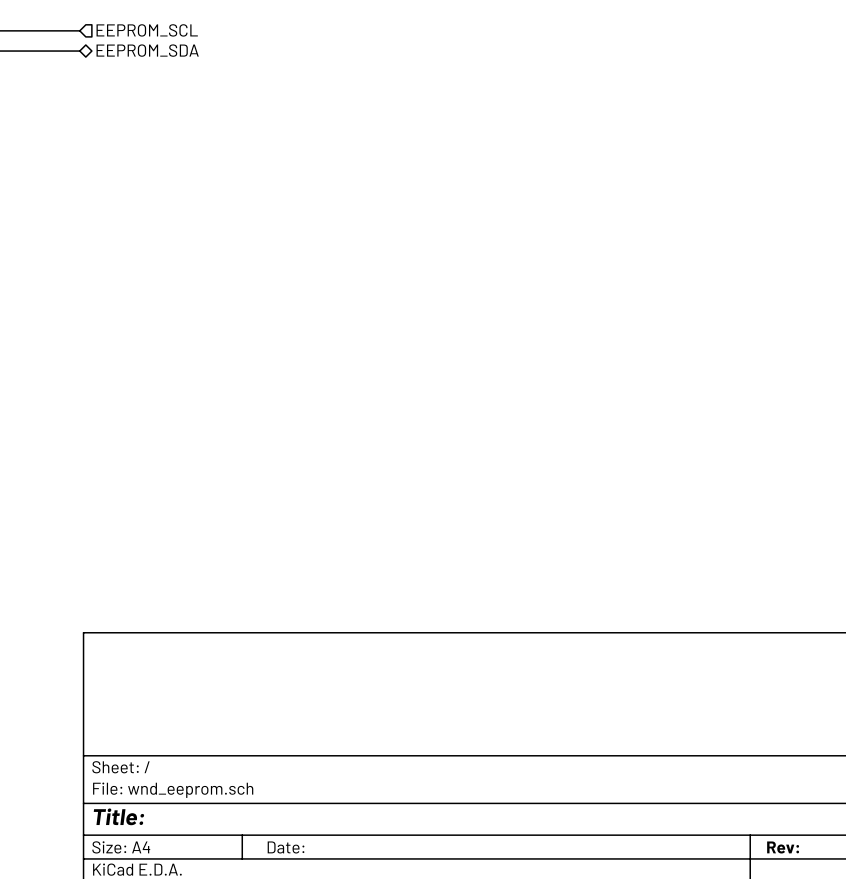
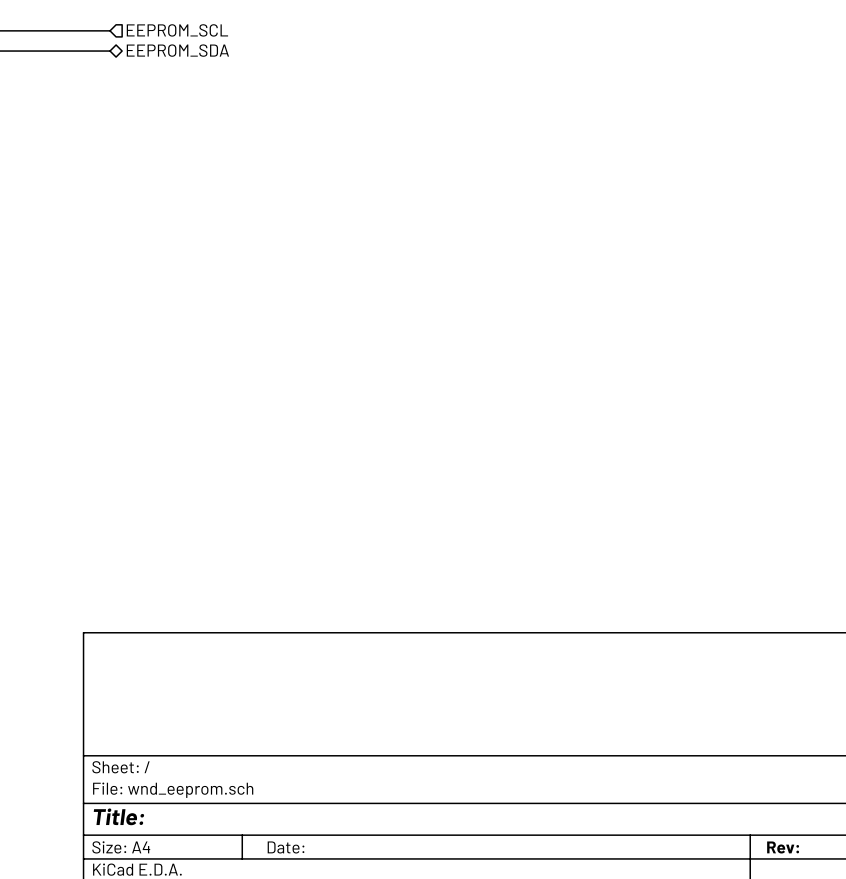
wire: none -> (79, 30) (110, 30)
hierarchical label position: EEPROM_SCL (147, 30) -> EEPROM_SCL (177, 30)
hierarchical label position: EEPROM_SDA (147, 50) -> EEPROM_SDA (177, 50)
wire: none -> (79, 51) (110, 51)

